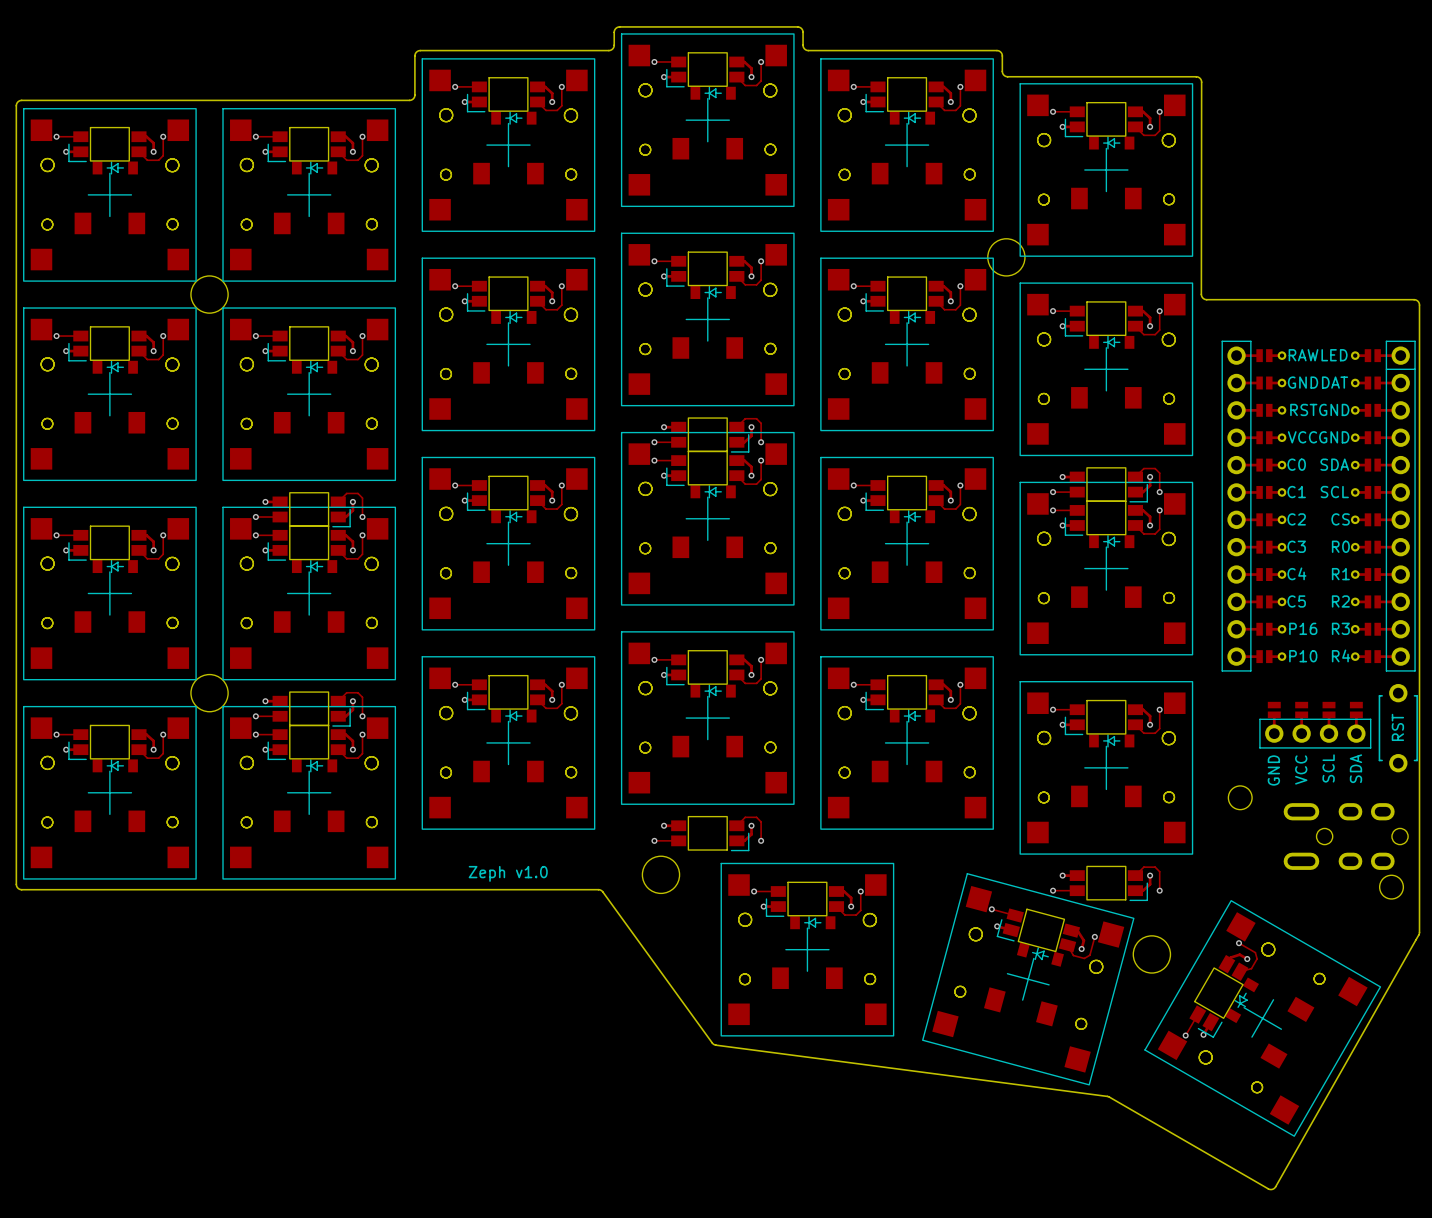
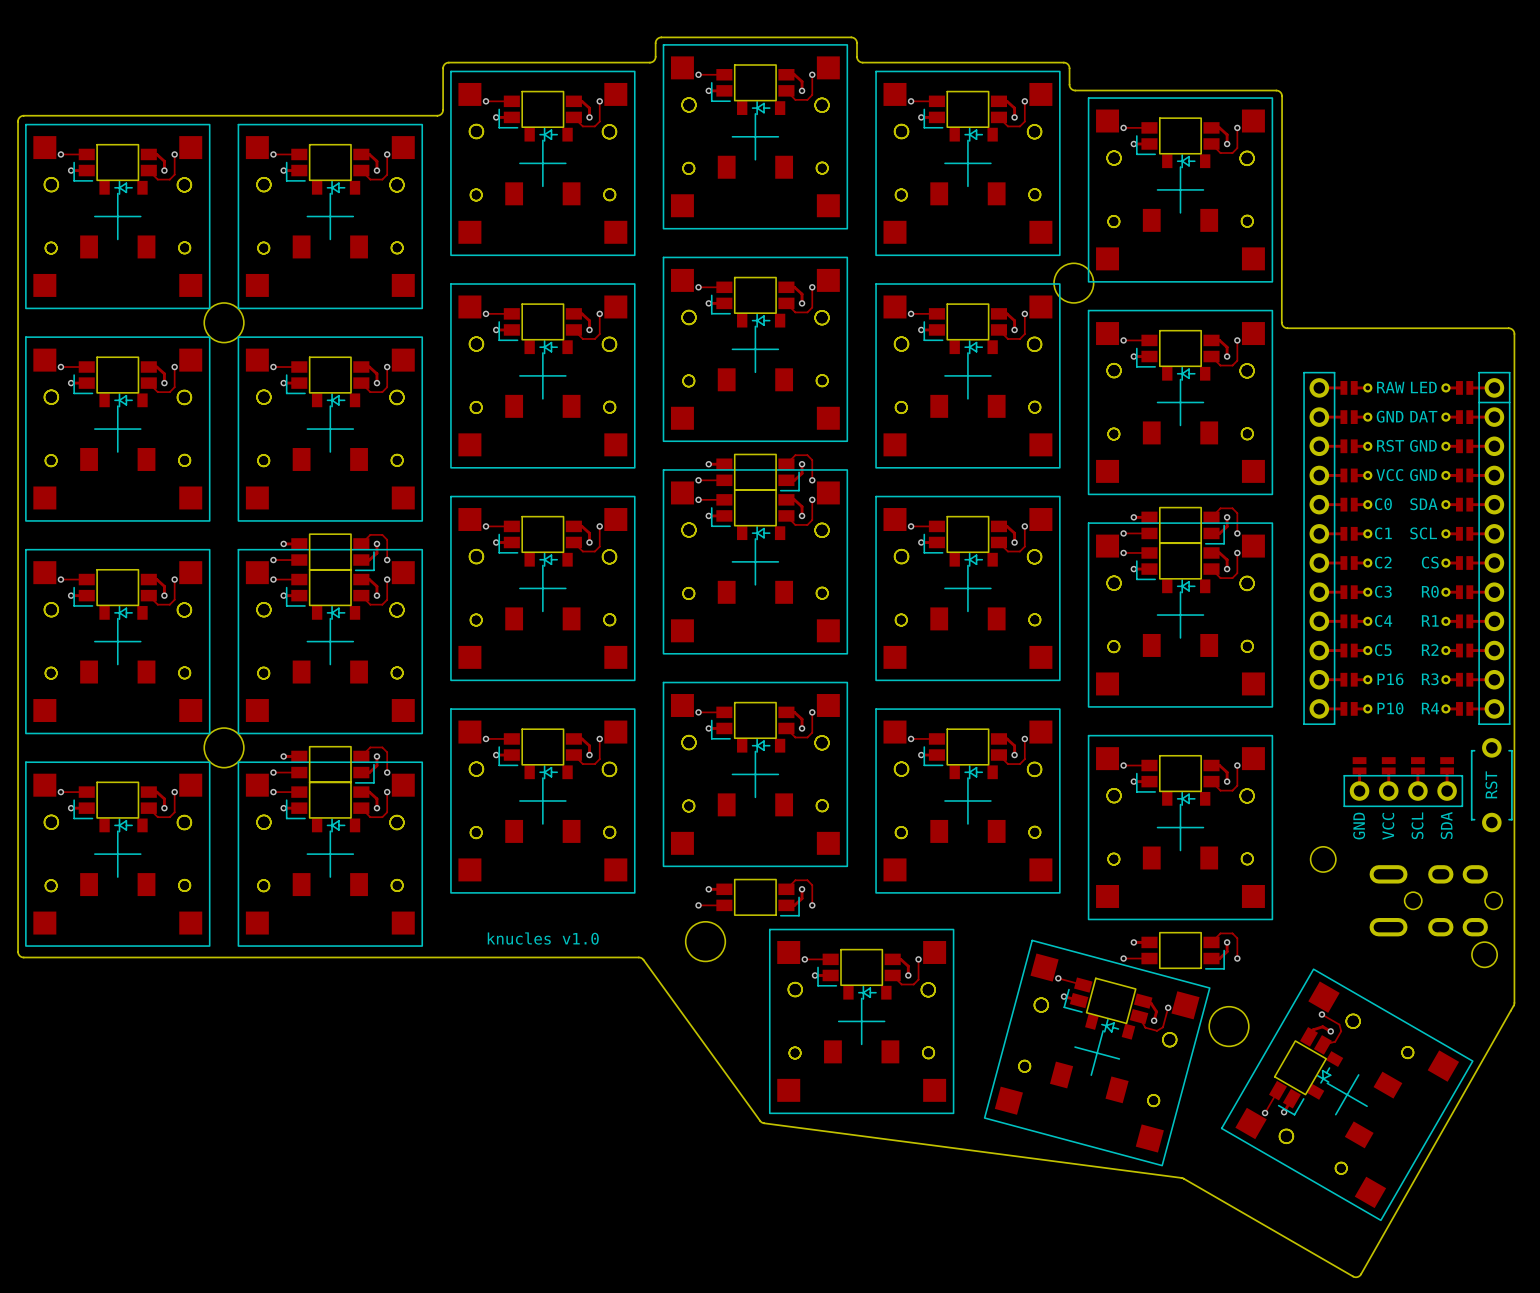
text: Zeph v1.0 (508, 873) -> knucles v1.0 (543, 938)

